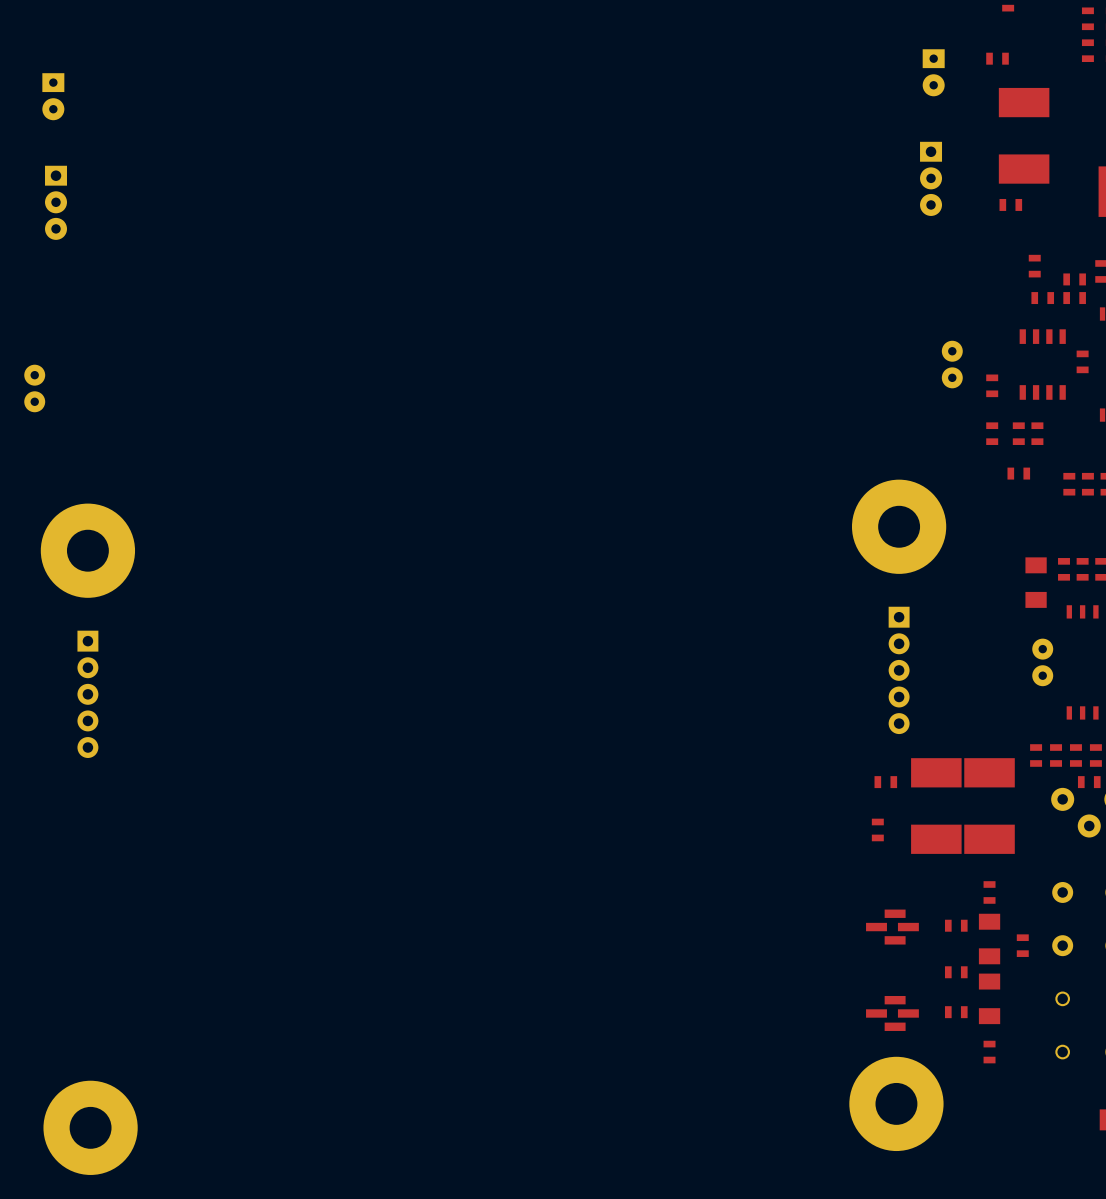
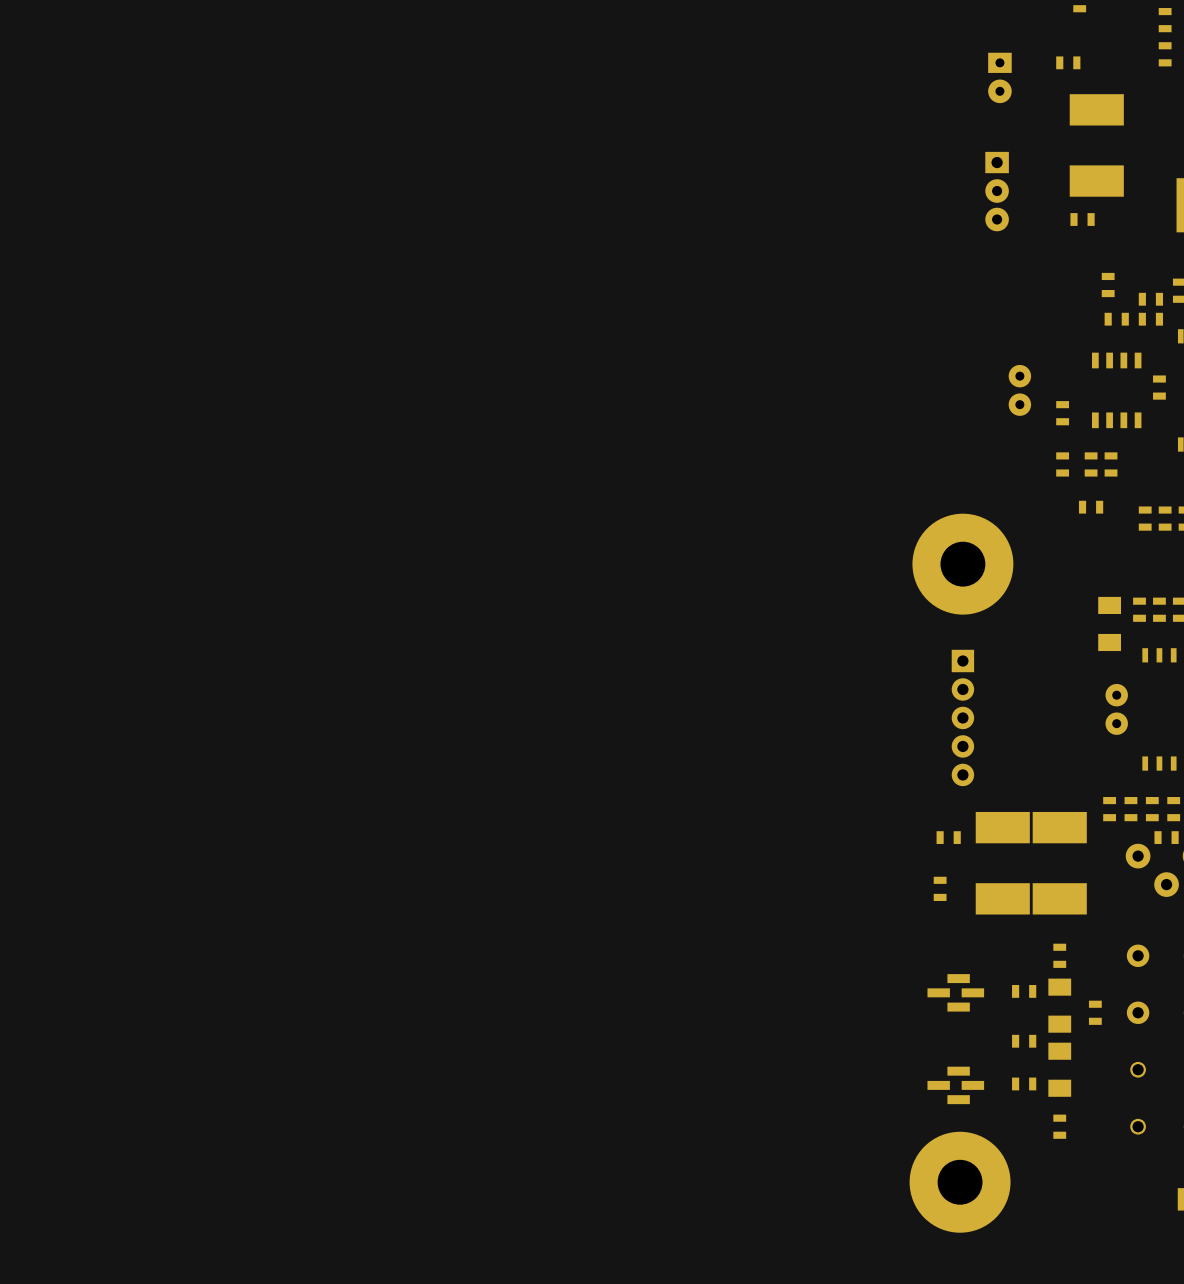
part: (53, 96) -> none
part: (56, 202) -> none
part: (34, 388) -> none
part: (87, 550) -> none
part: (87, 694) -> none
part: (90, 1127) -> none

